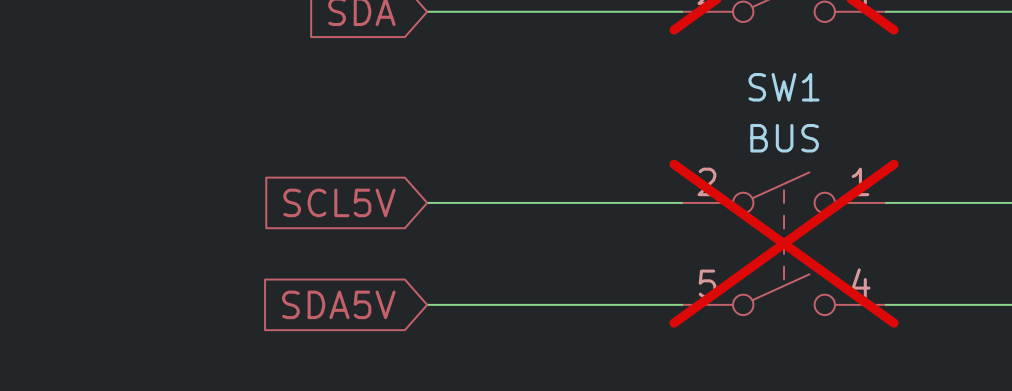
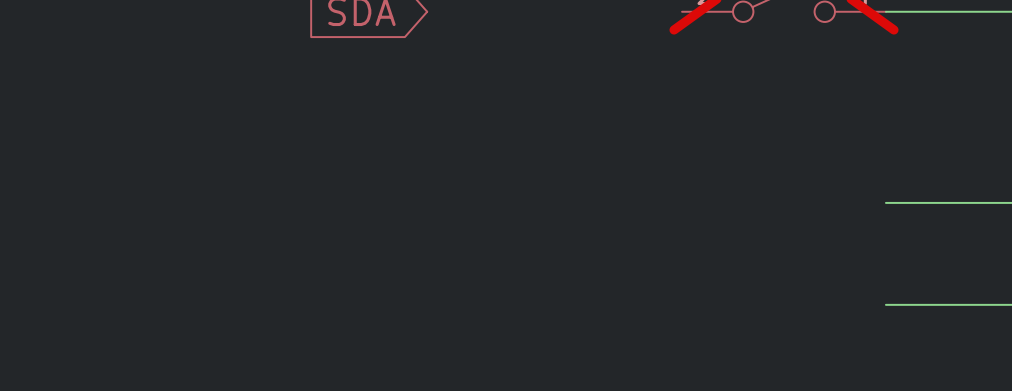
wire: (427, 11) (682, 11) -> none
global label: SCL5V (339, 202) -> none
wire: (427, 202) (682, 202) -> none
SW1: BUS (784, 243) -> none
global label: SDA5V (338, 304) -> none
wire: (427, 304) (682, 304) -> none

